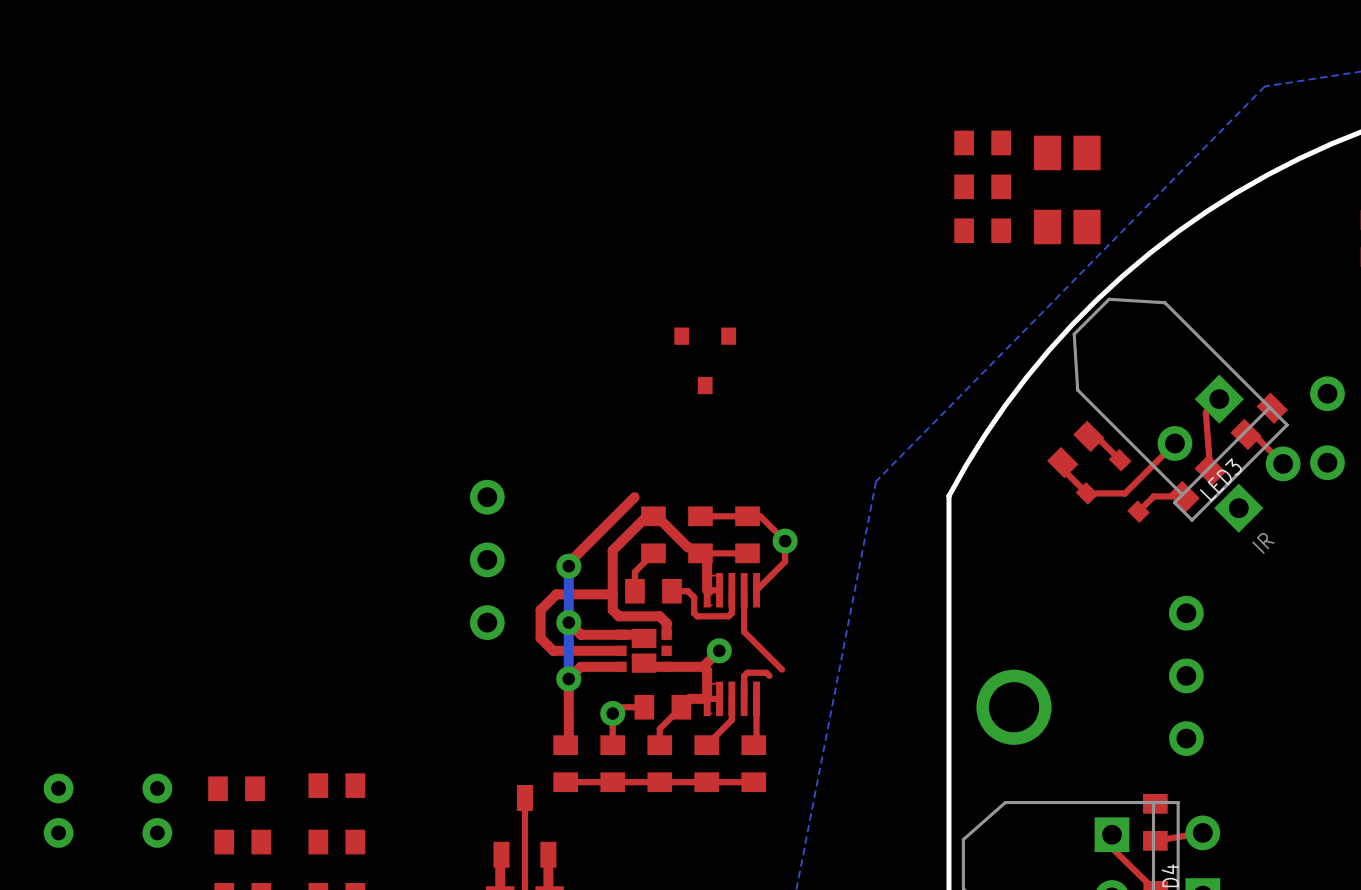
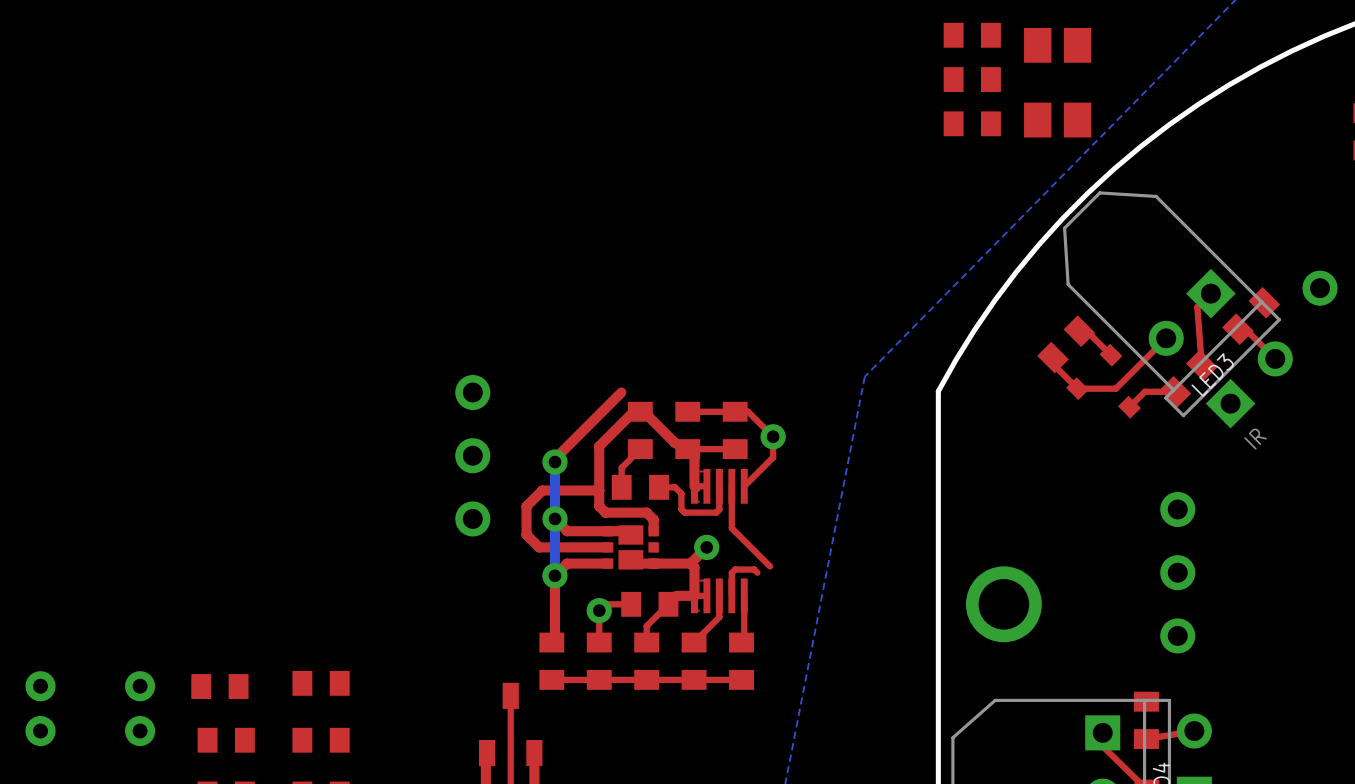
part: (705, 360) -> none
part: (1327, 428) -> none

